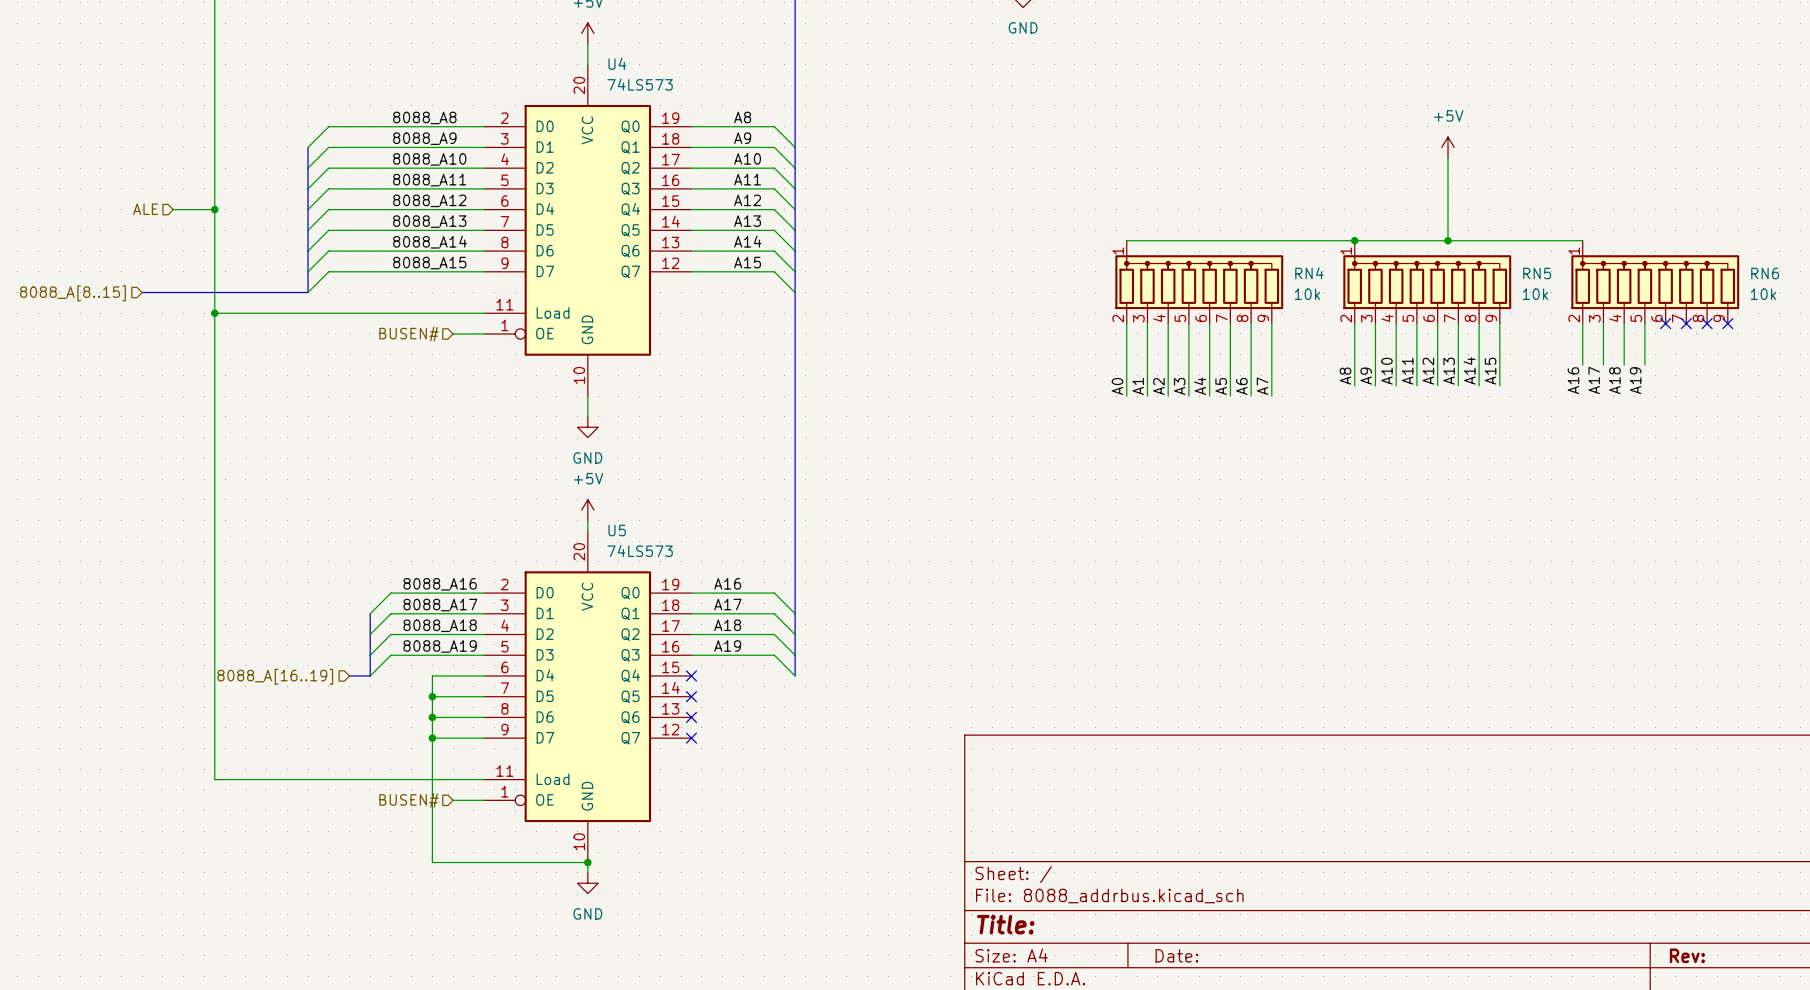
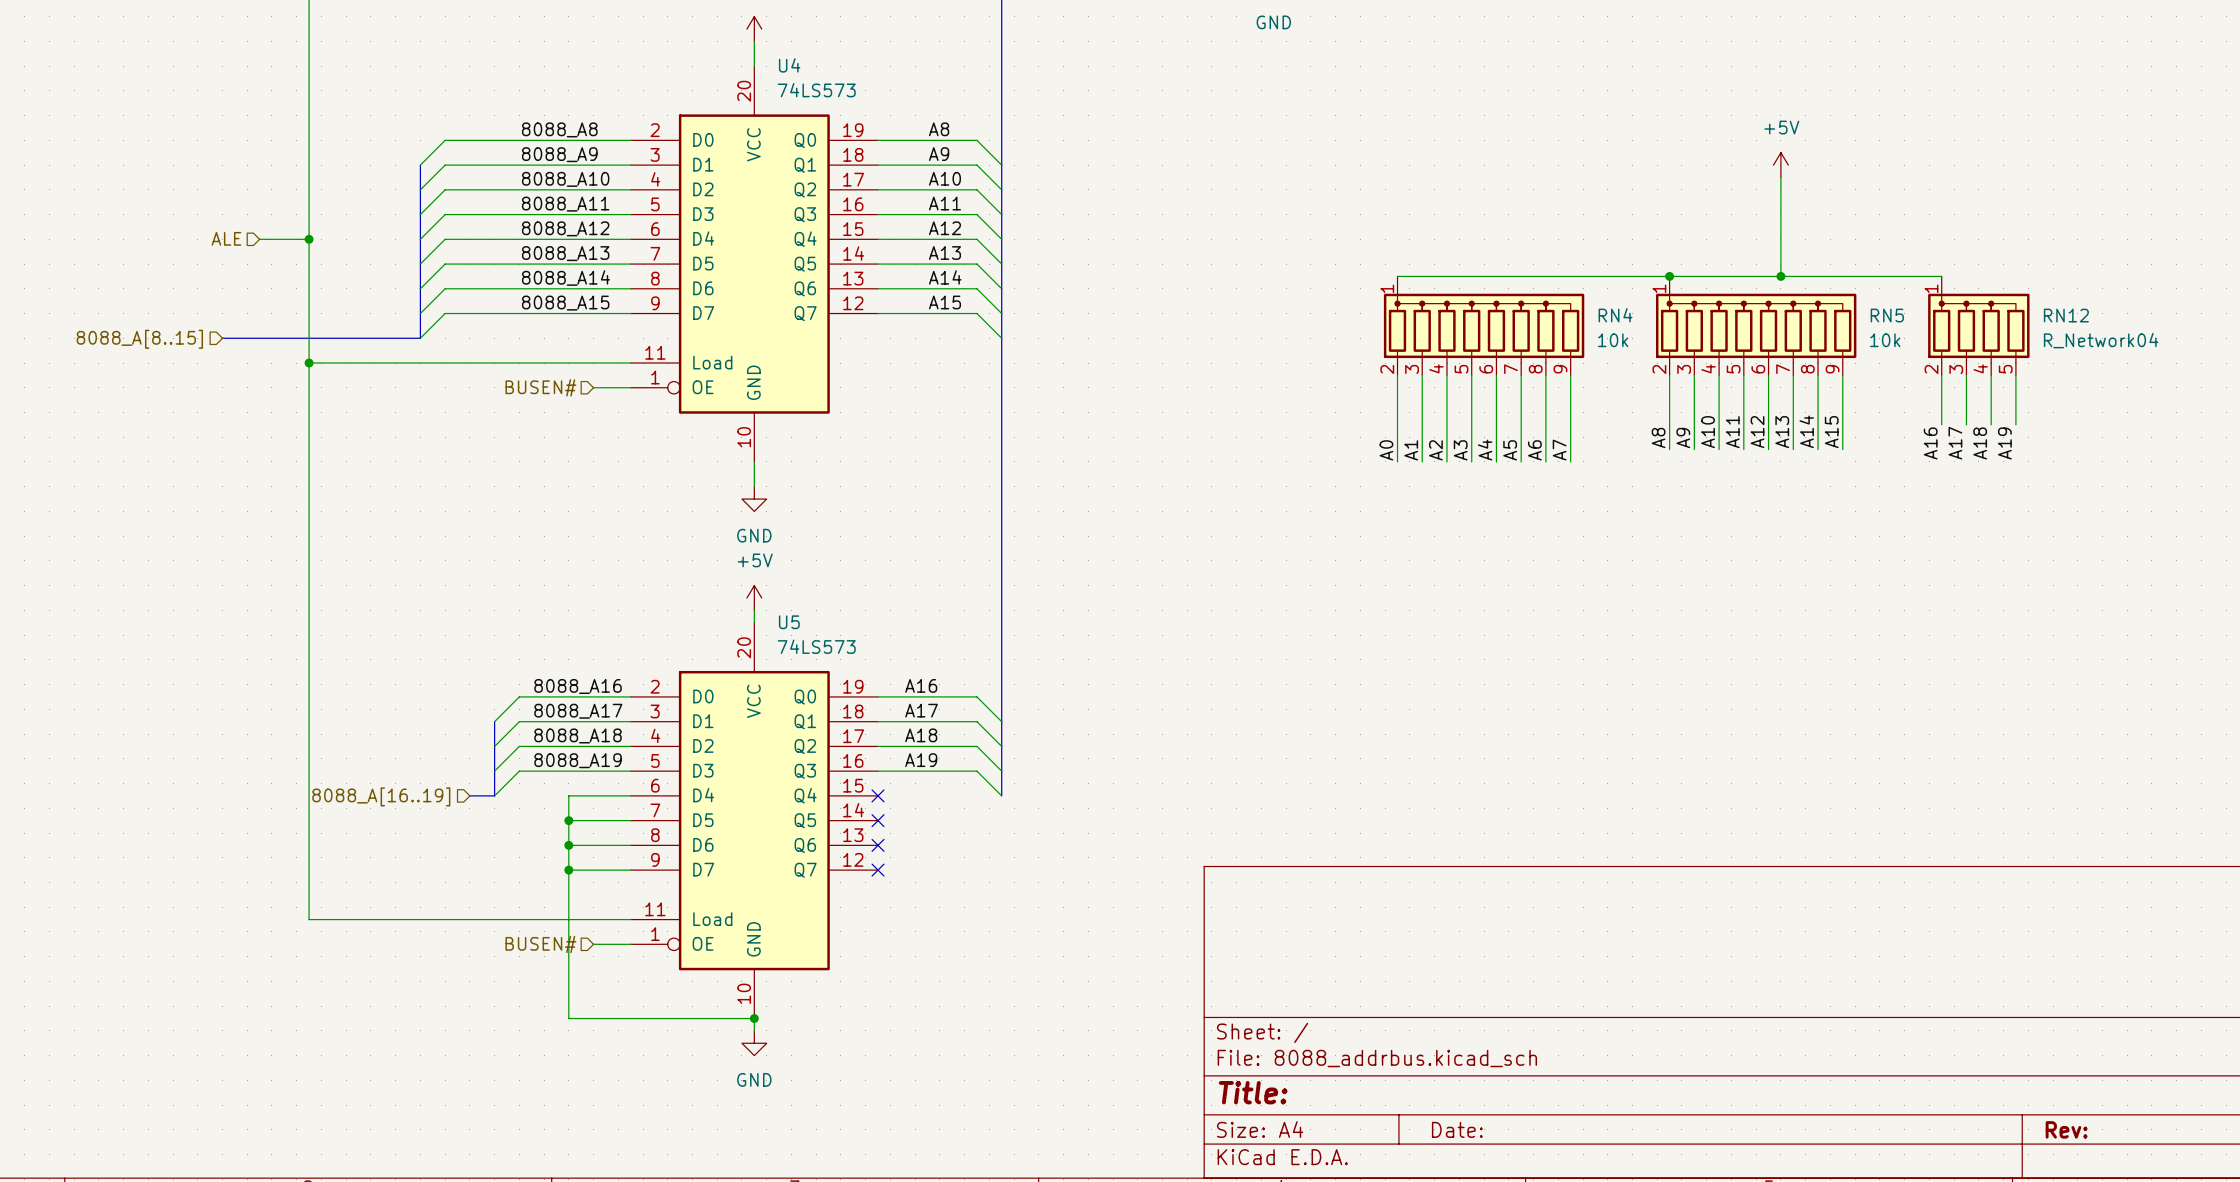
RN12: none -> R_Network04 (1978, 325)
RN6: 10k (1655, 282) -> none
no-connect mark: (1665, 323) -> none
no-connect mark: (1686, 323) -> none
no-connect mark: (1707, 323) -> none
no-connect mark: (1727, 323) -> none

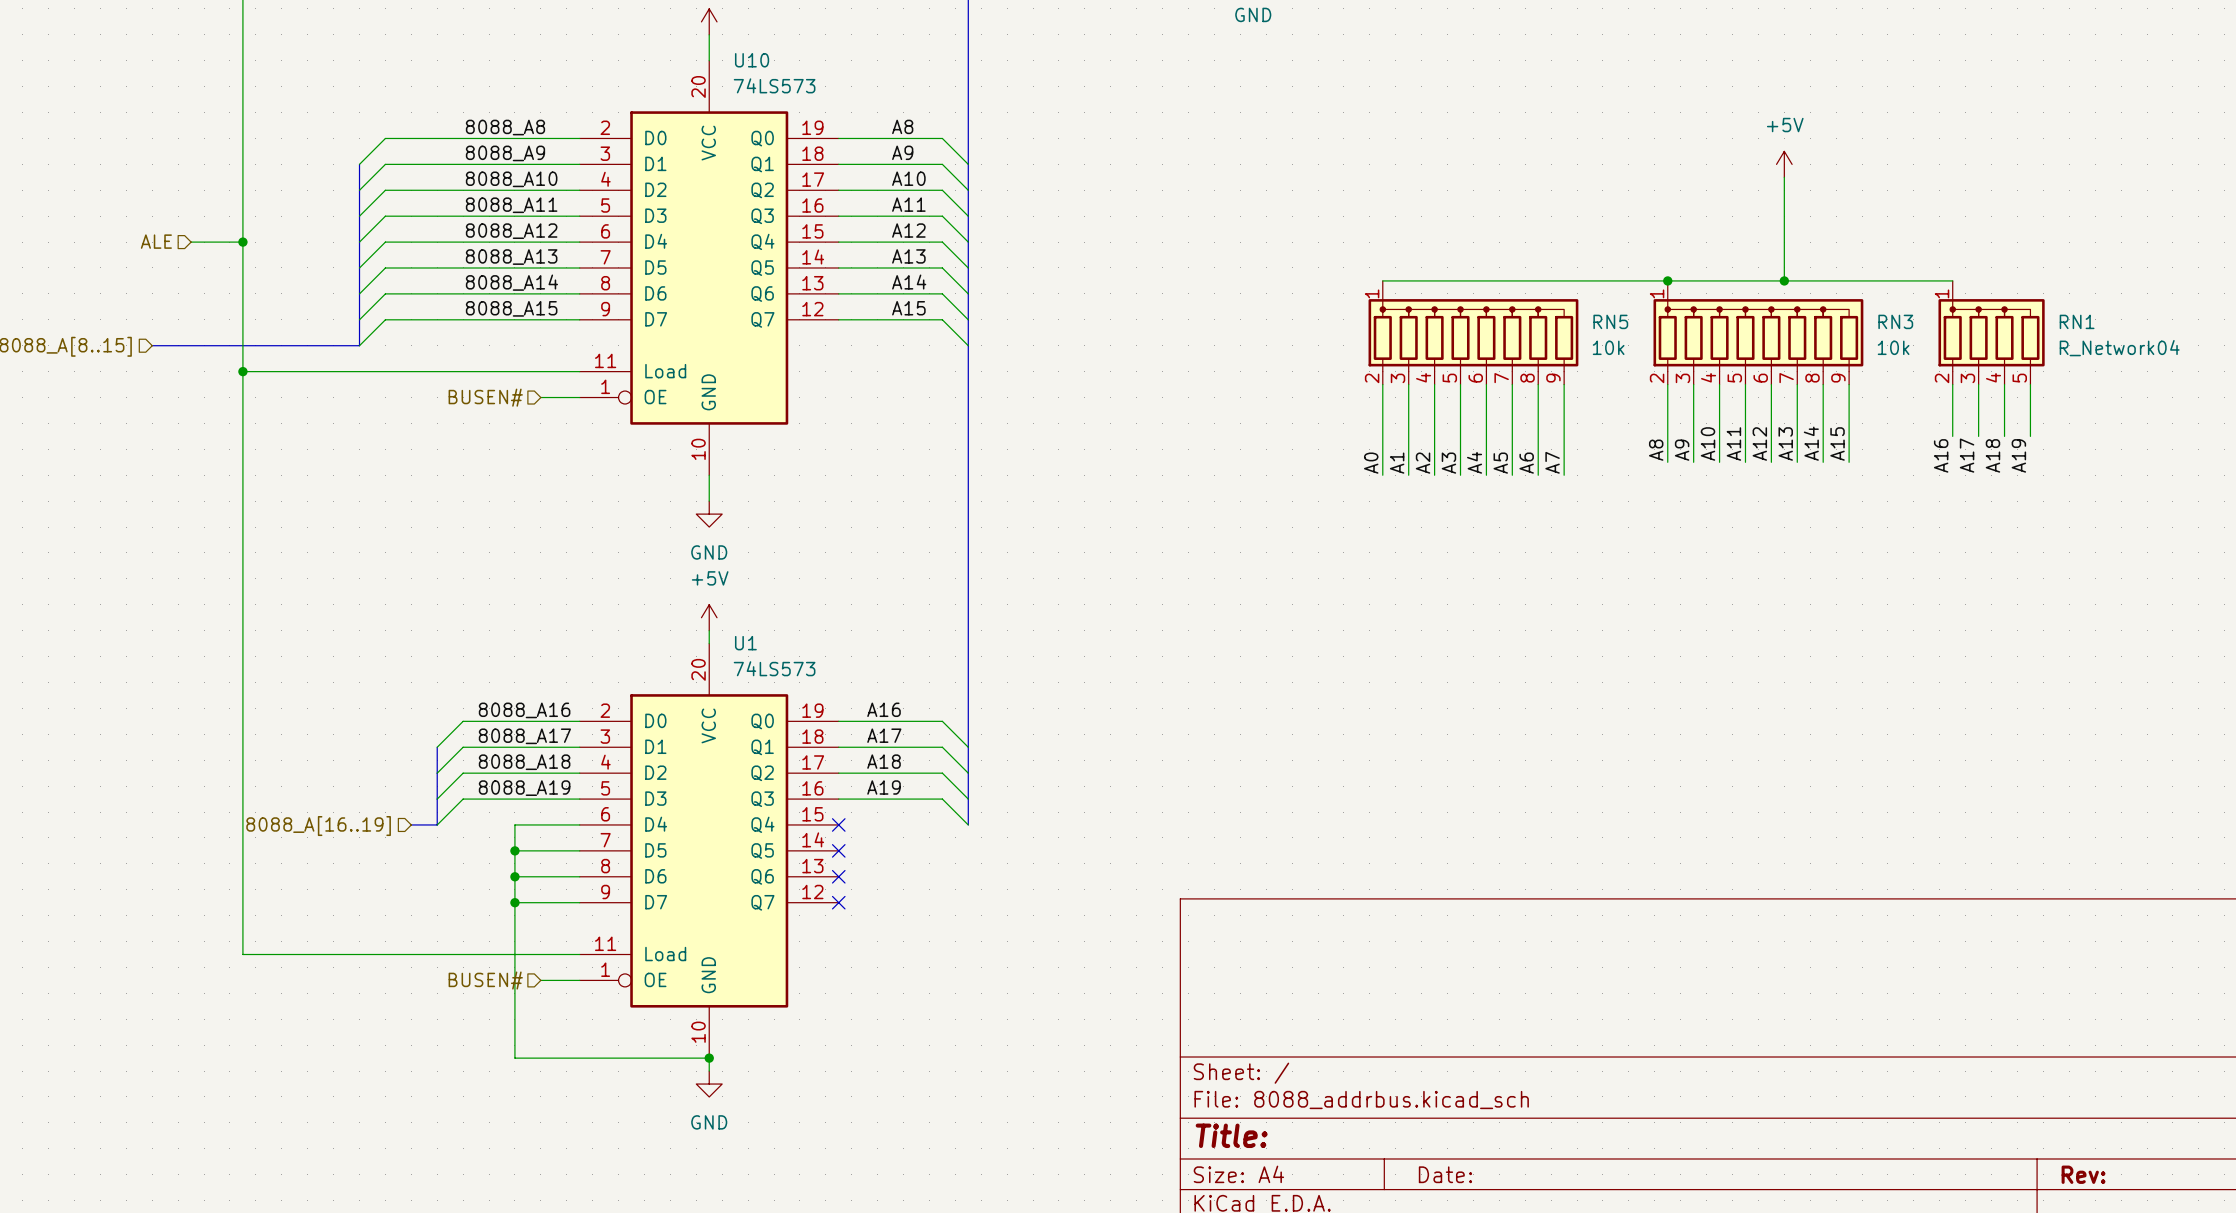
U4 name: U4 (789, 65) -> U10 (752, 60)
RN4 name: RN4 (1615, 315) -> RN5 (1610, 321)
RN5 name: RN5 (1887, 315) -> RN3 (1895, 321)
RN12 name: RN12 (2066, 315) -> RN1 (2077, 321)
U5 name: U5 (789, 622) -> U1 (745, 643)

